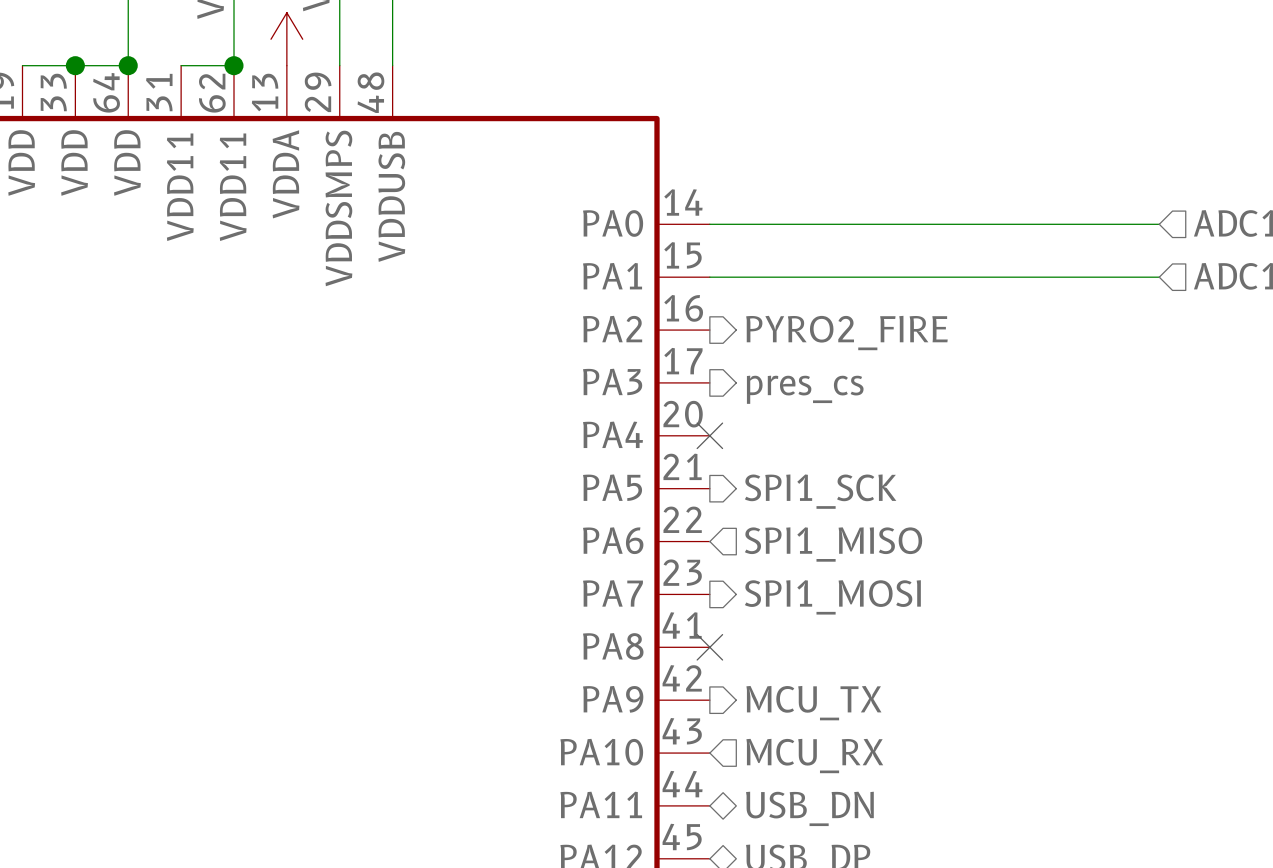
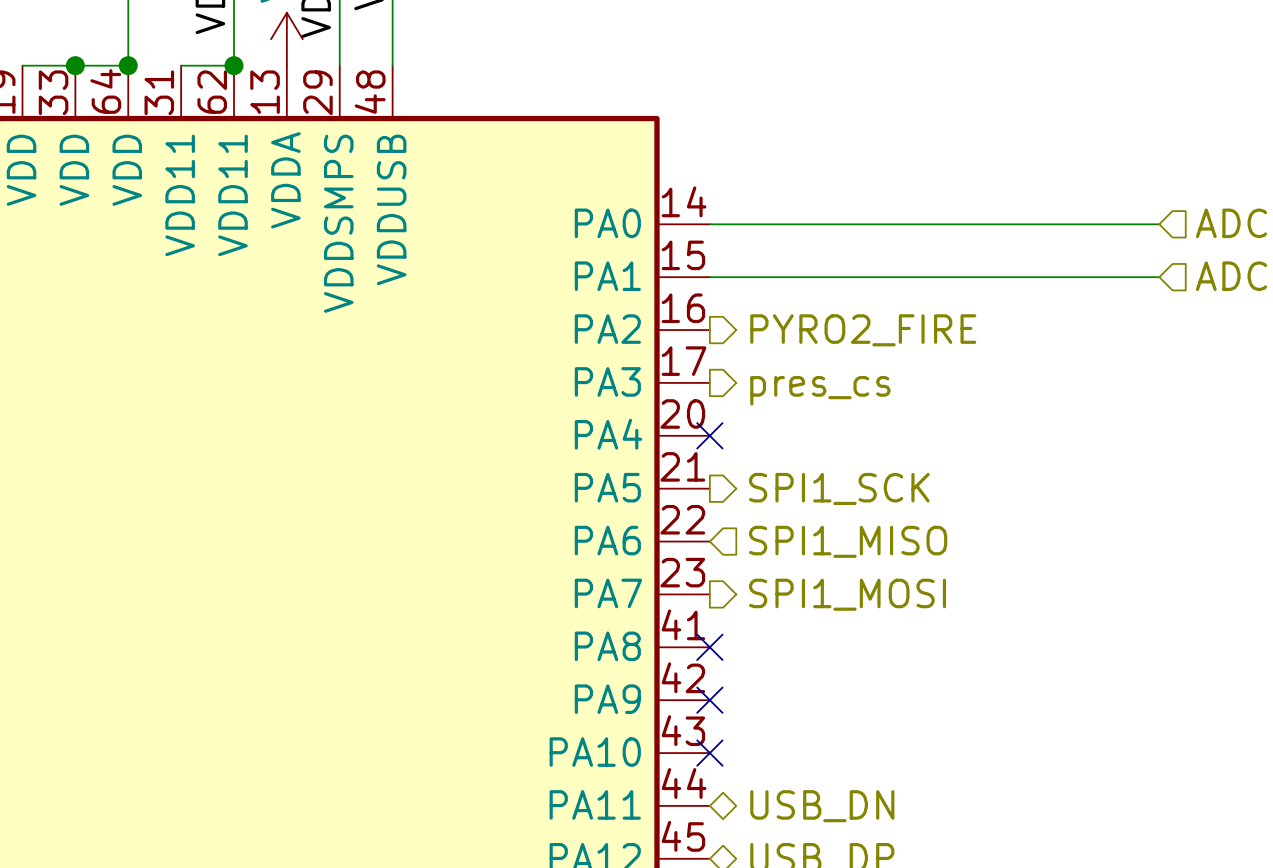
no-connect mark: none -> (709, 700)
hierarchical label: MCU_TX (813, 703) -> none
no-connect mark: none -> (709, 753)
hierarchical label: MCU_RX (814, 756) -> none

